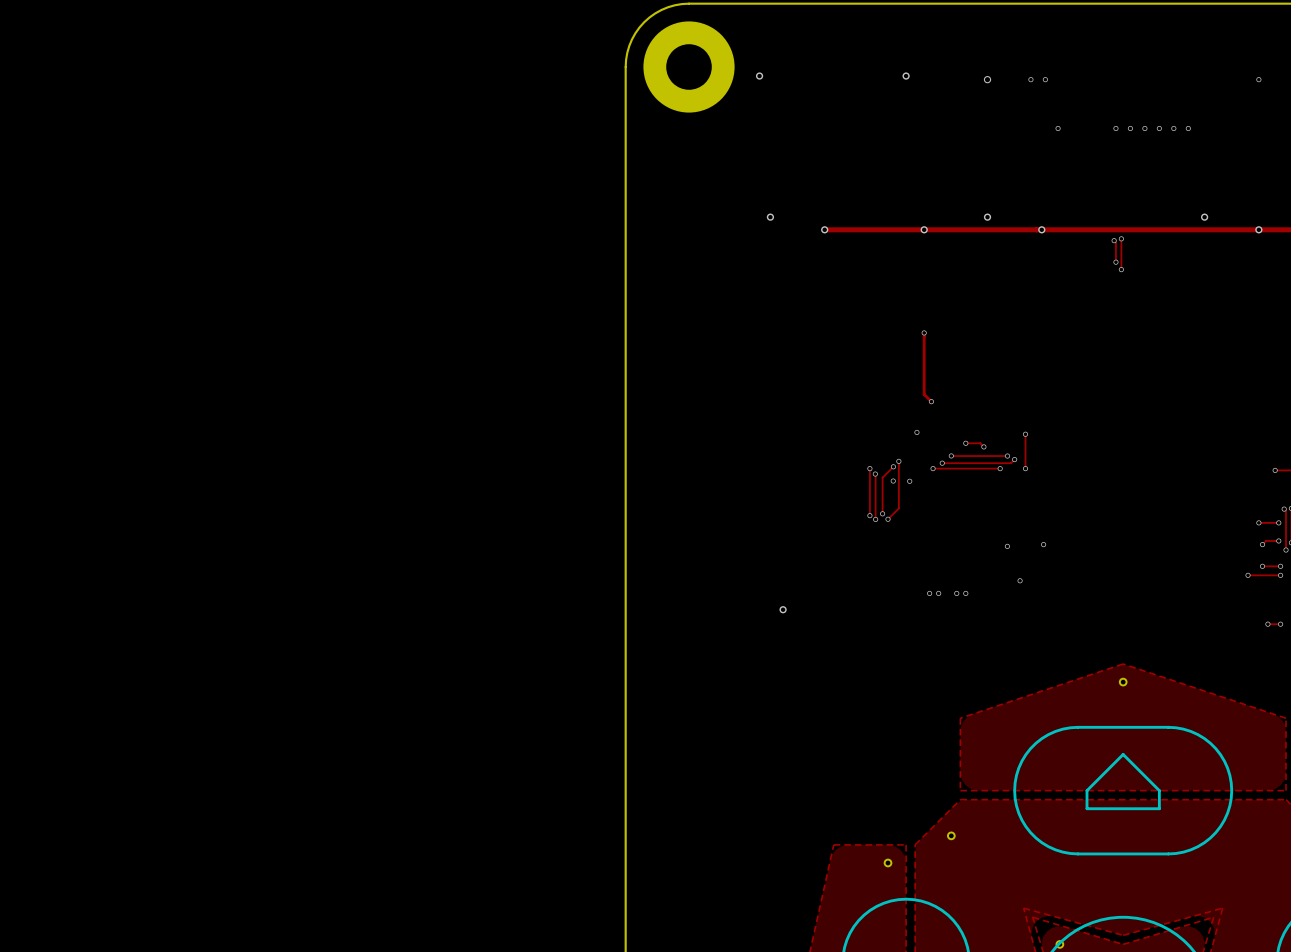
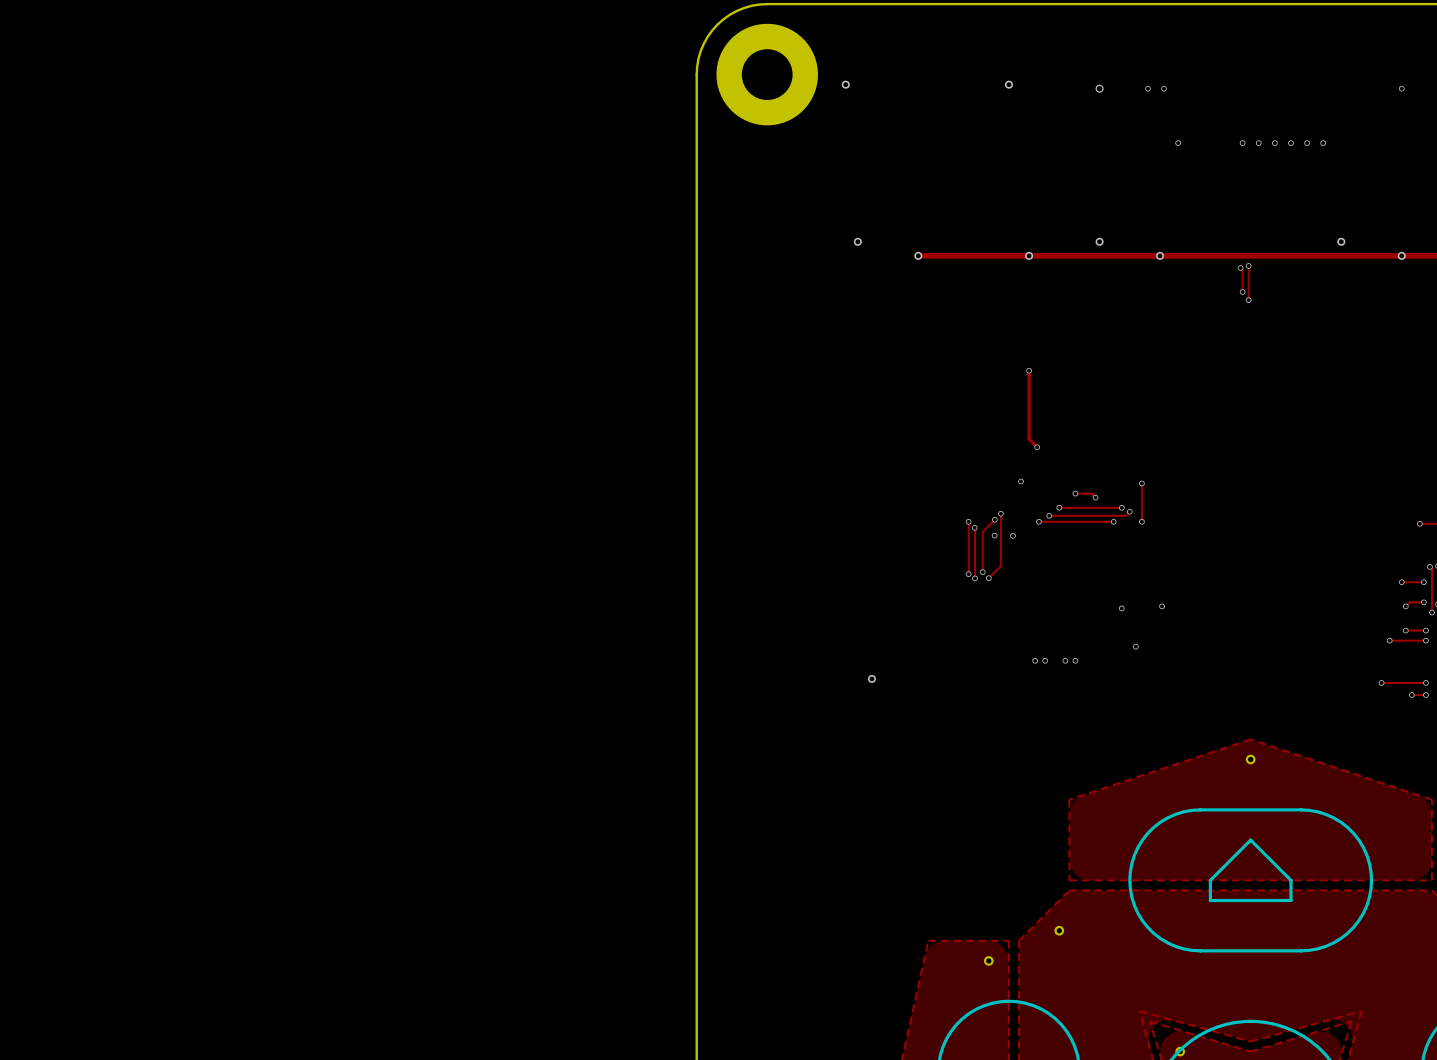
track: none -> (1381, 682) (1425, 682)
via: none -> (1381, 682)
via: none -> (1425, 682)

